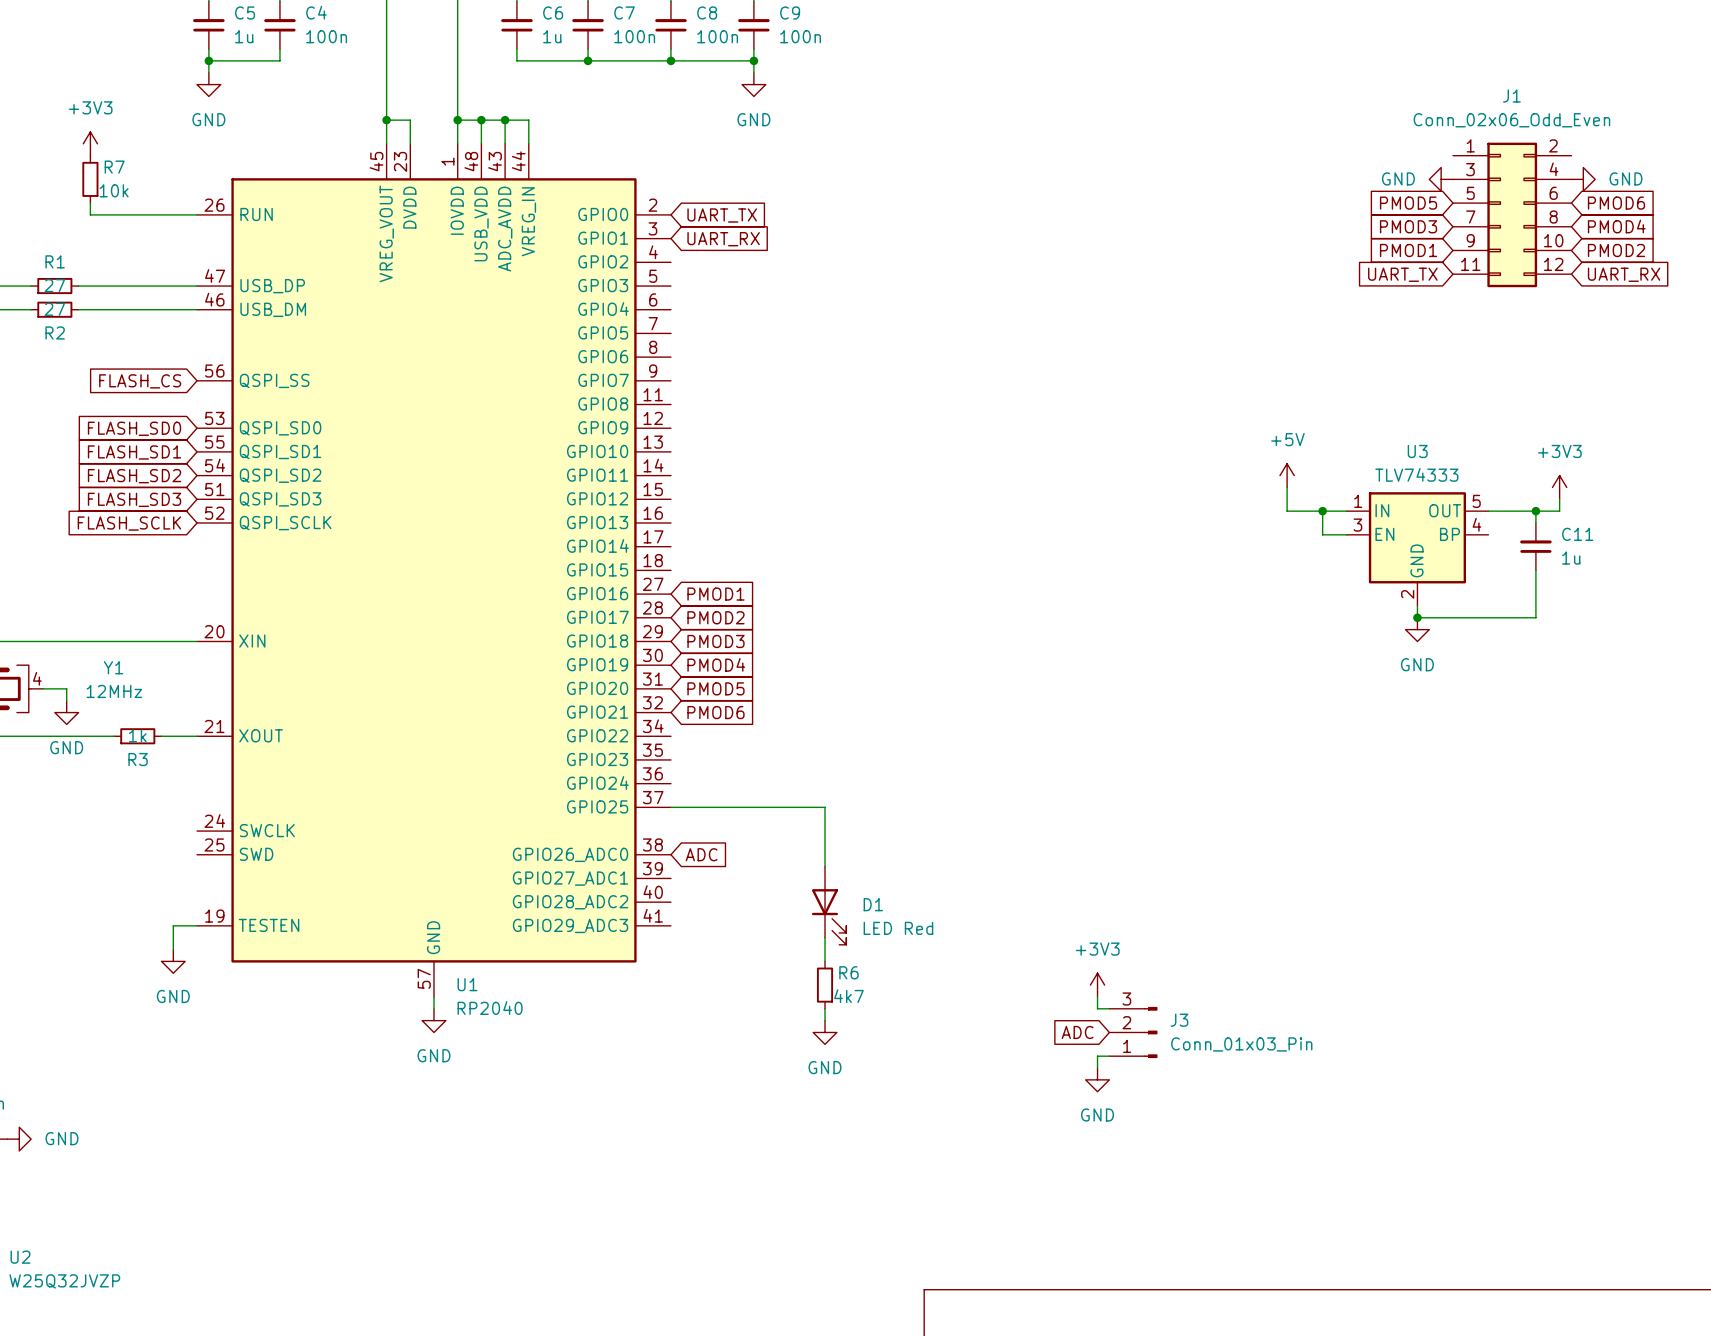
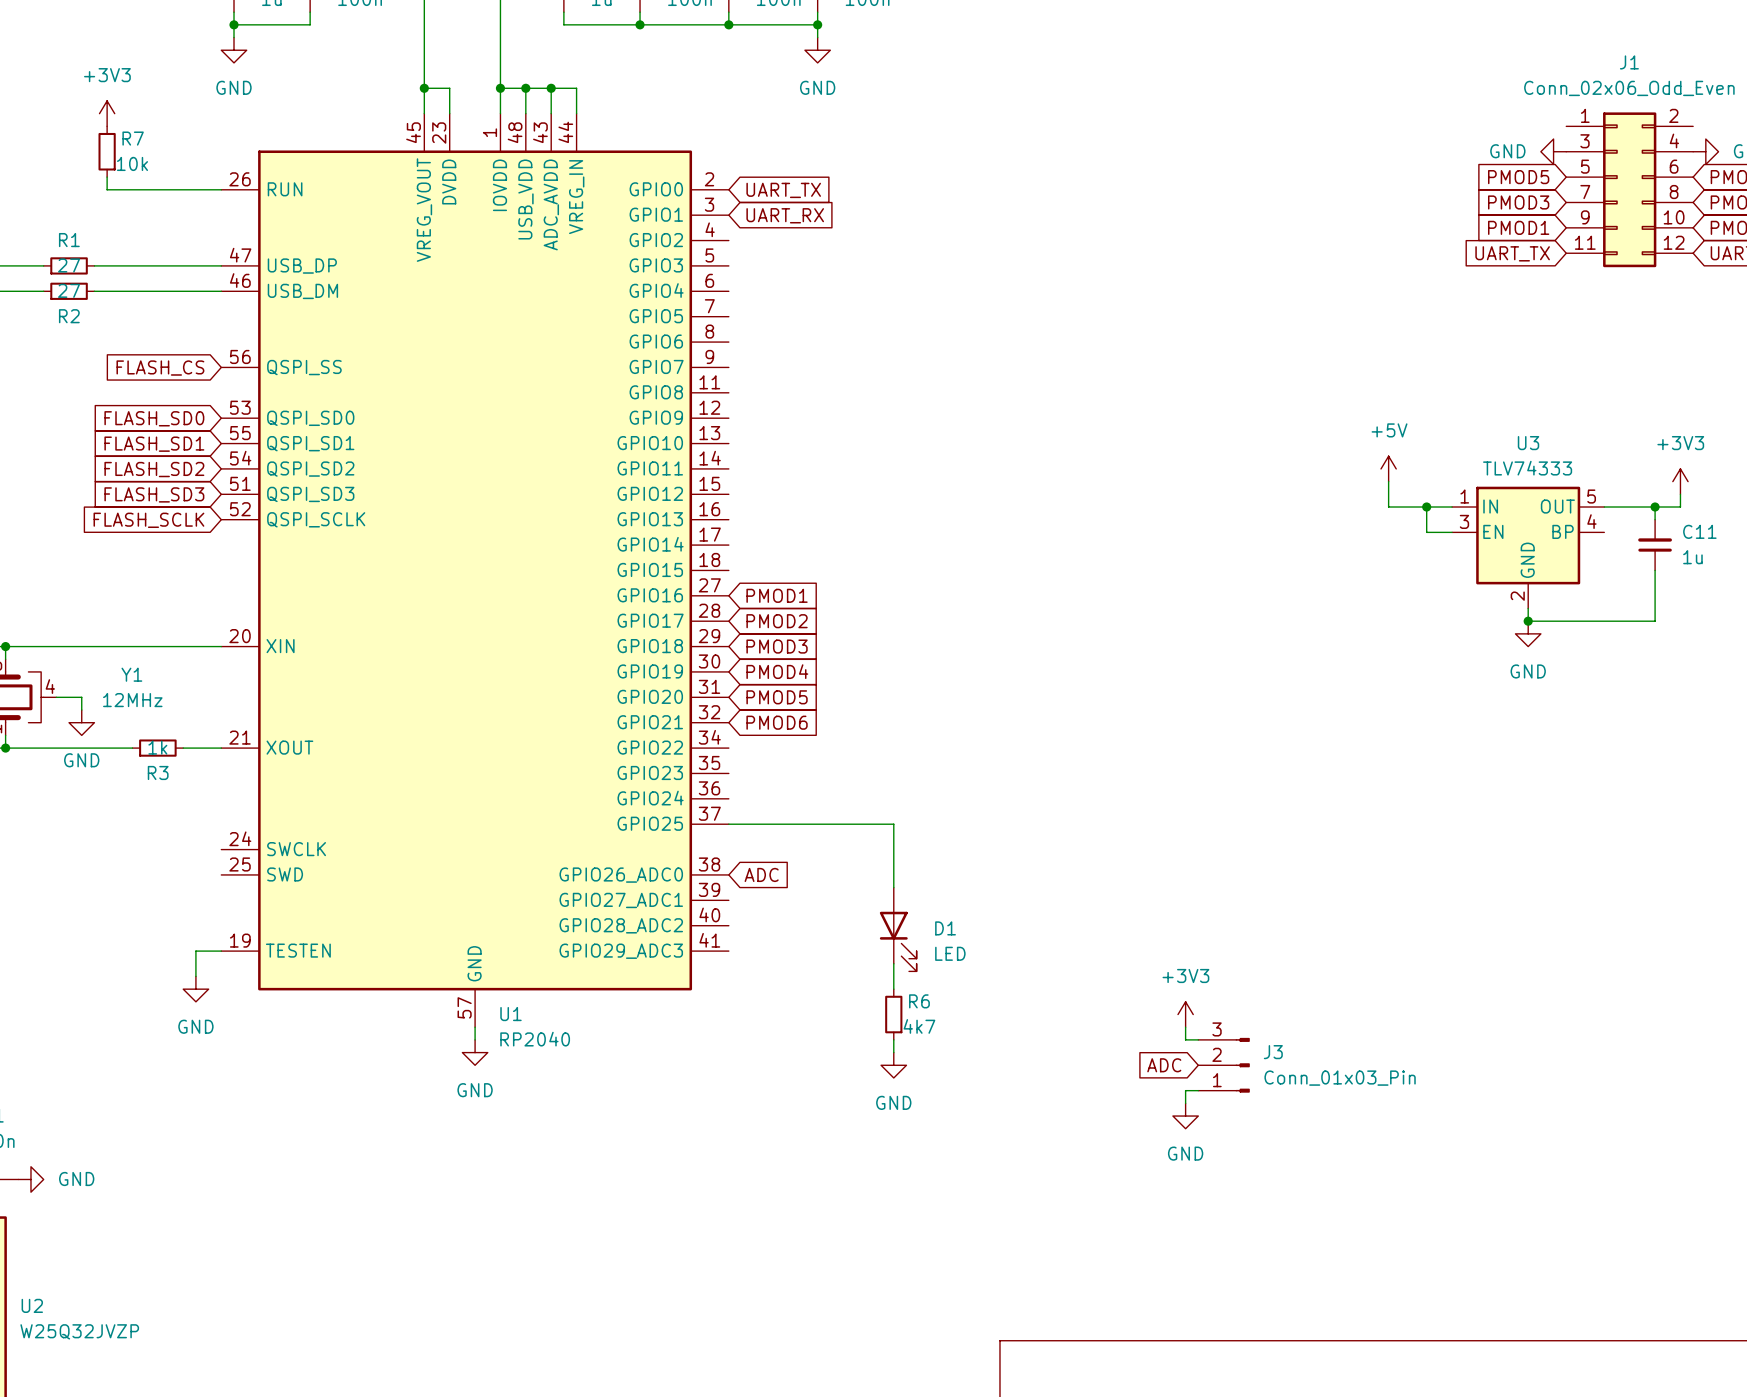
D1 value: LED Red (898, 928) -> LED (950, 953)

